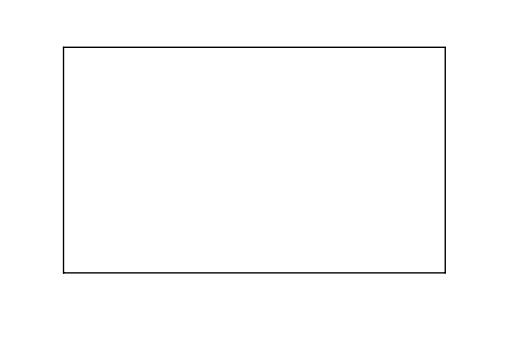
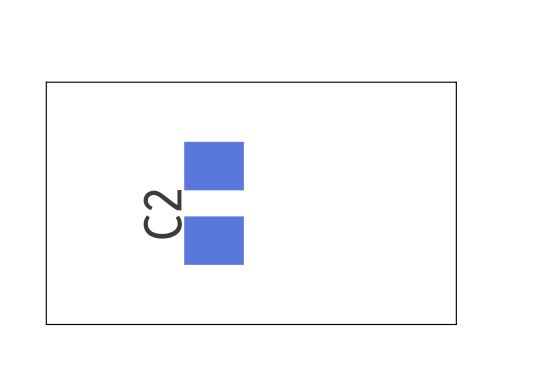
C2: none -> (214, 203)

